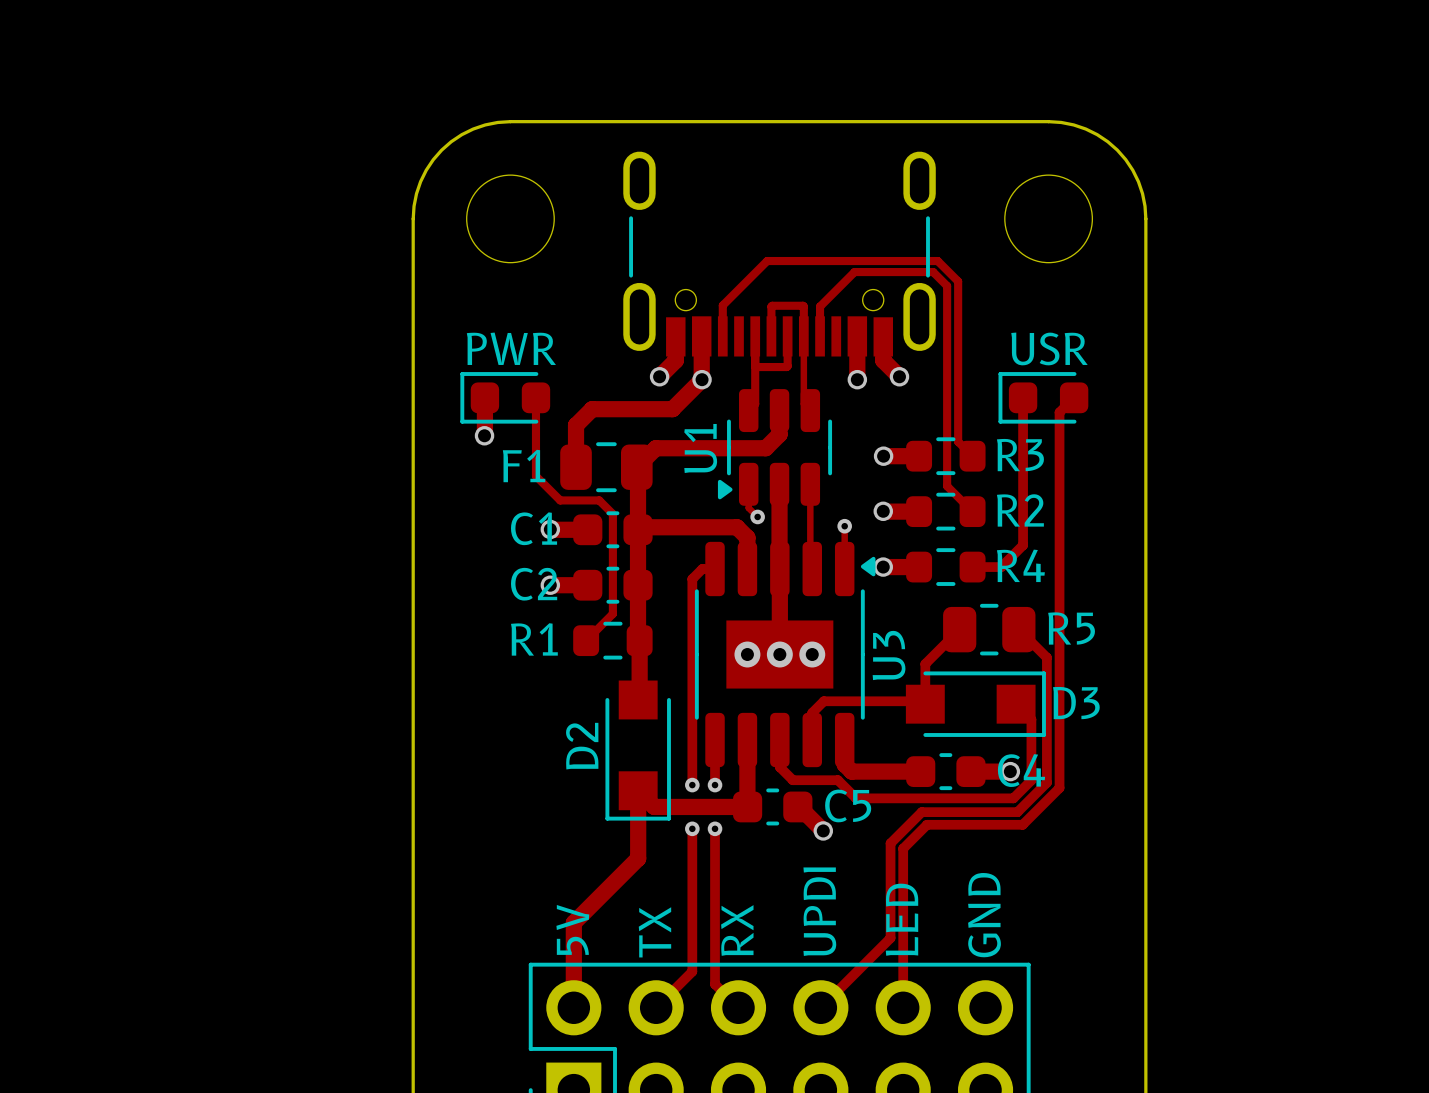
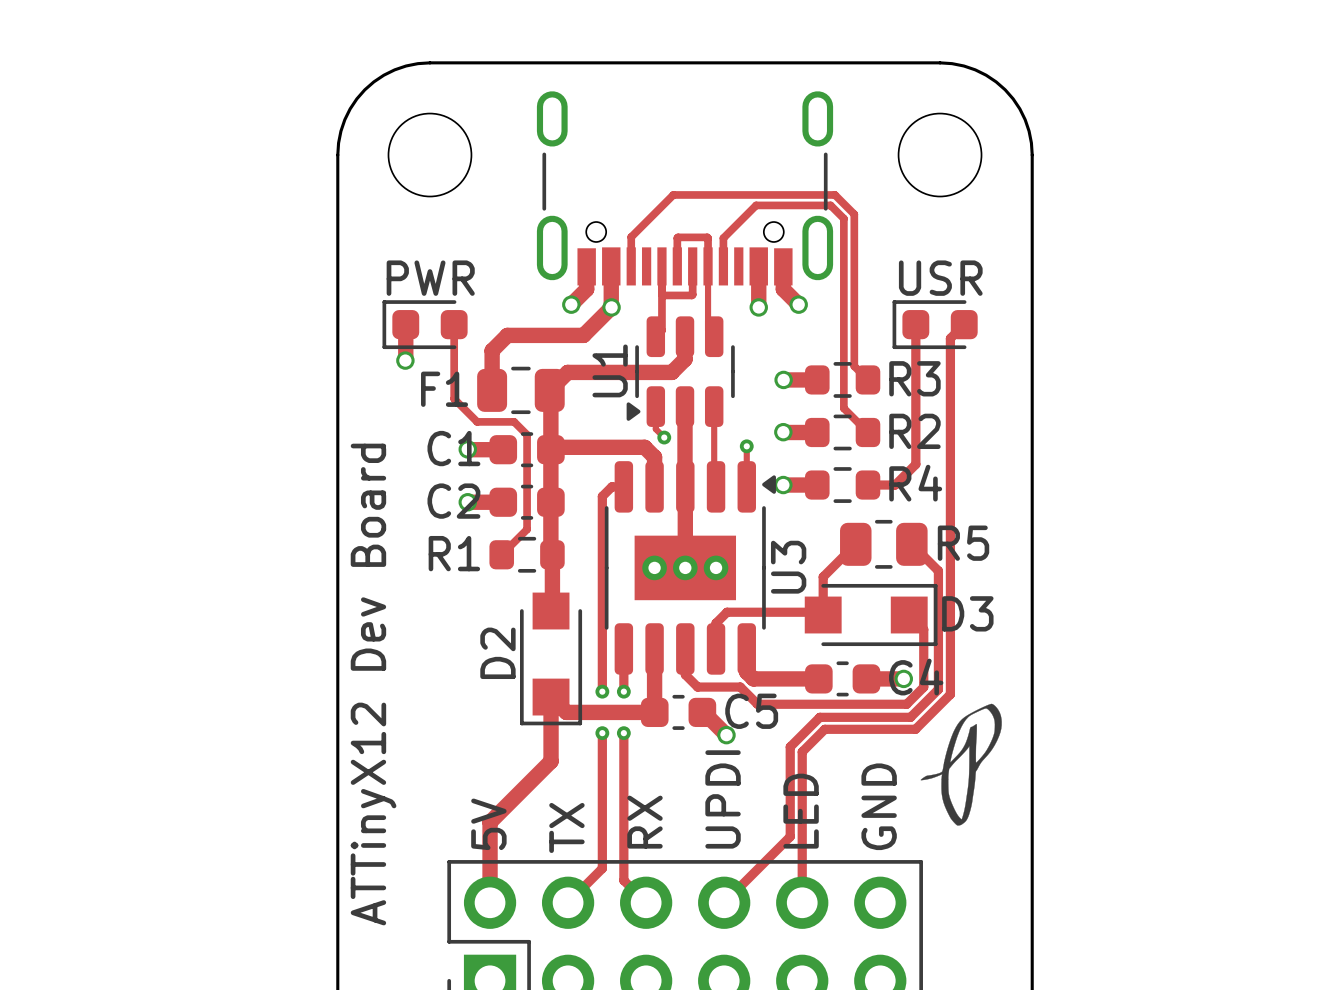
drawing: none -> [920, 703, 1002, 826]
text: none -> ATTinyX12 Dev Board (373, 684)

